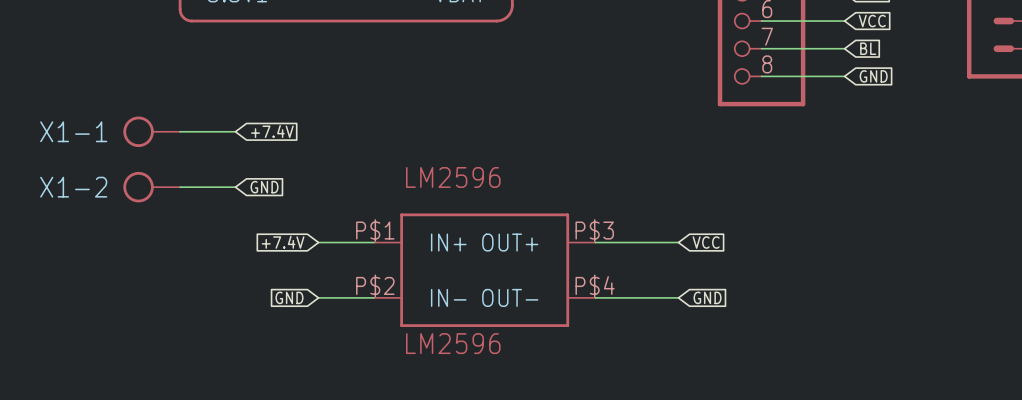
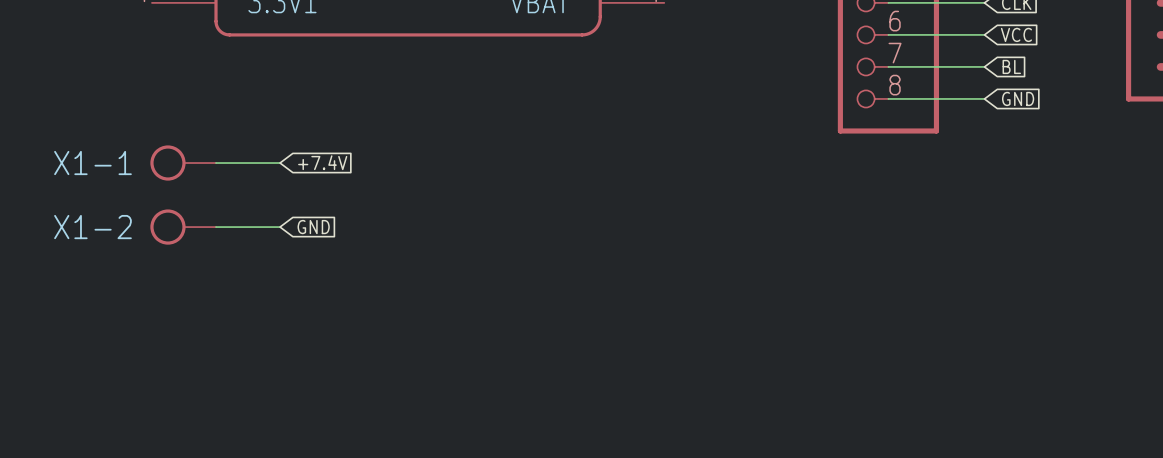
global label: +7.4V (283, 242) -> none
wire: (318, 242) (373, 242) -> none
wire: (595, 242) (678, 242) -> none
global label: VCC (706, 242) -> none
part: LM2596 (484, 270) -> none
global label: GND (289, 297) -> none
wire: (318, 297) (373, 297) -> none
wire: (595, 297) (678, 297) -> none
global label: GND (707, 297) -> none

